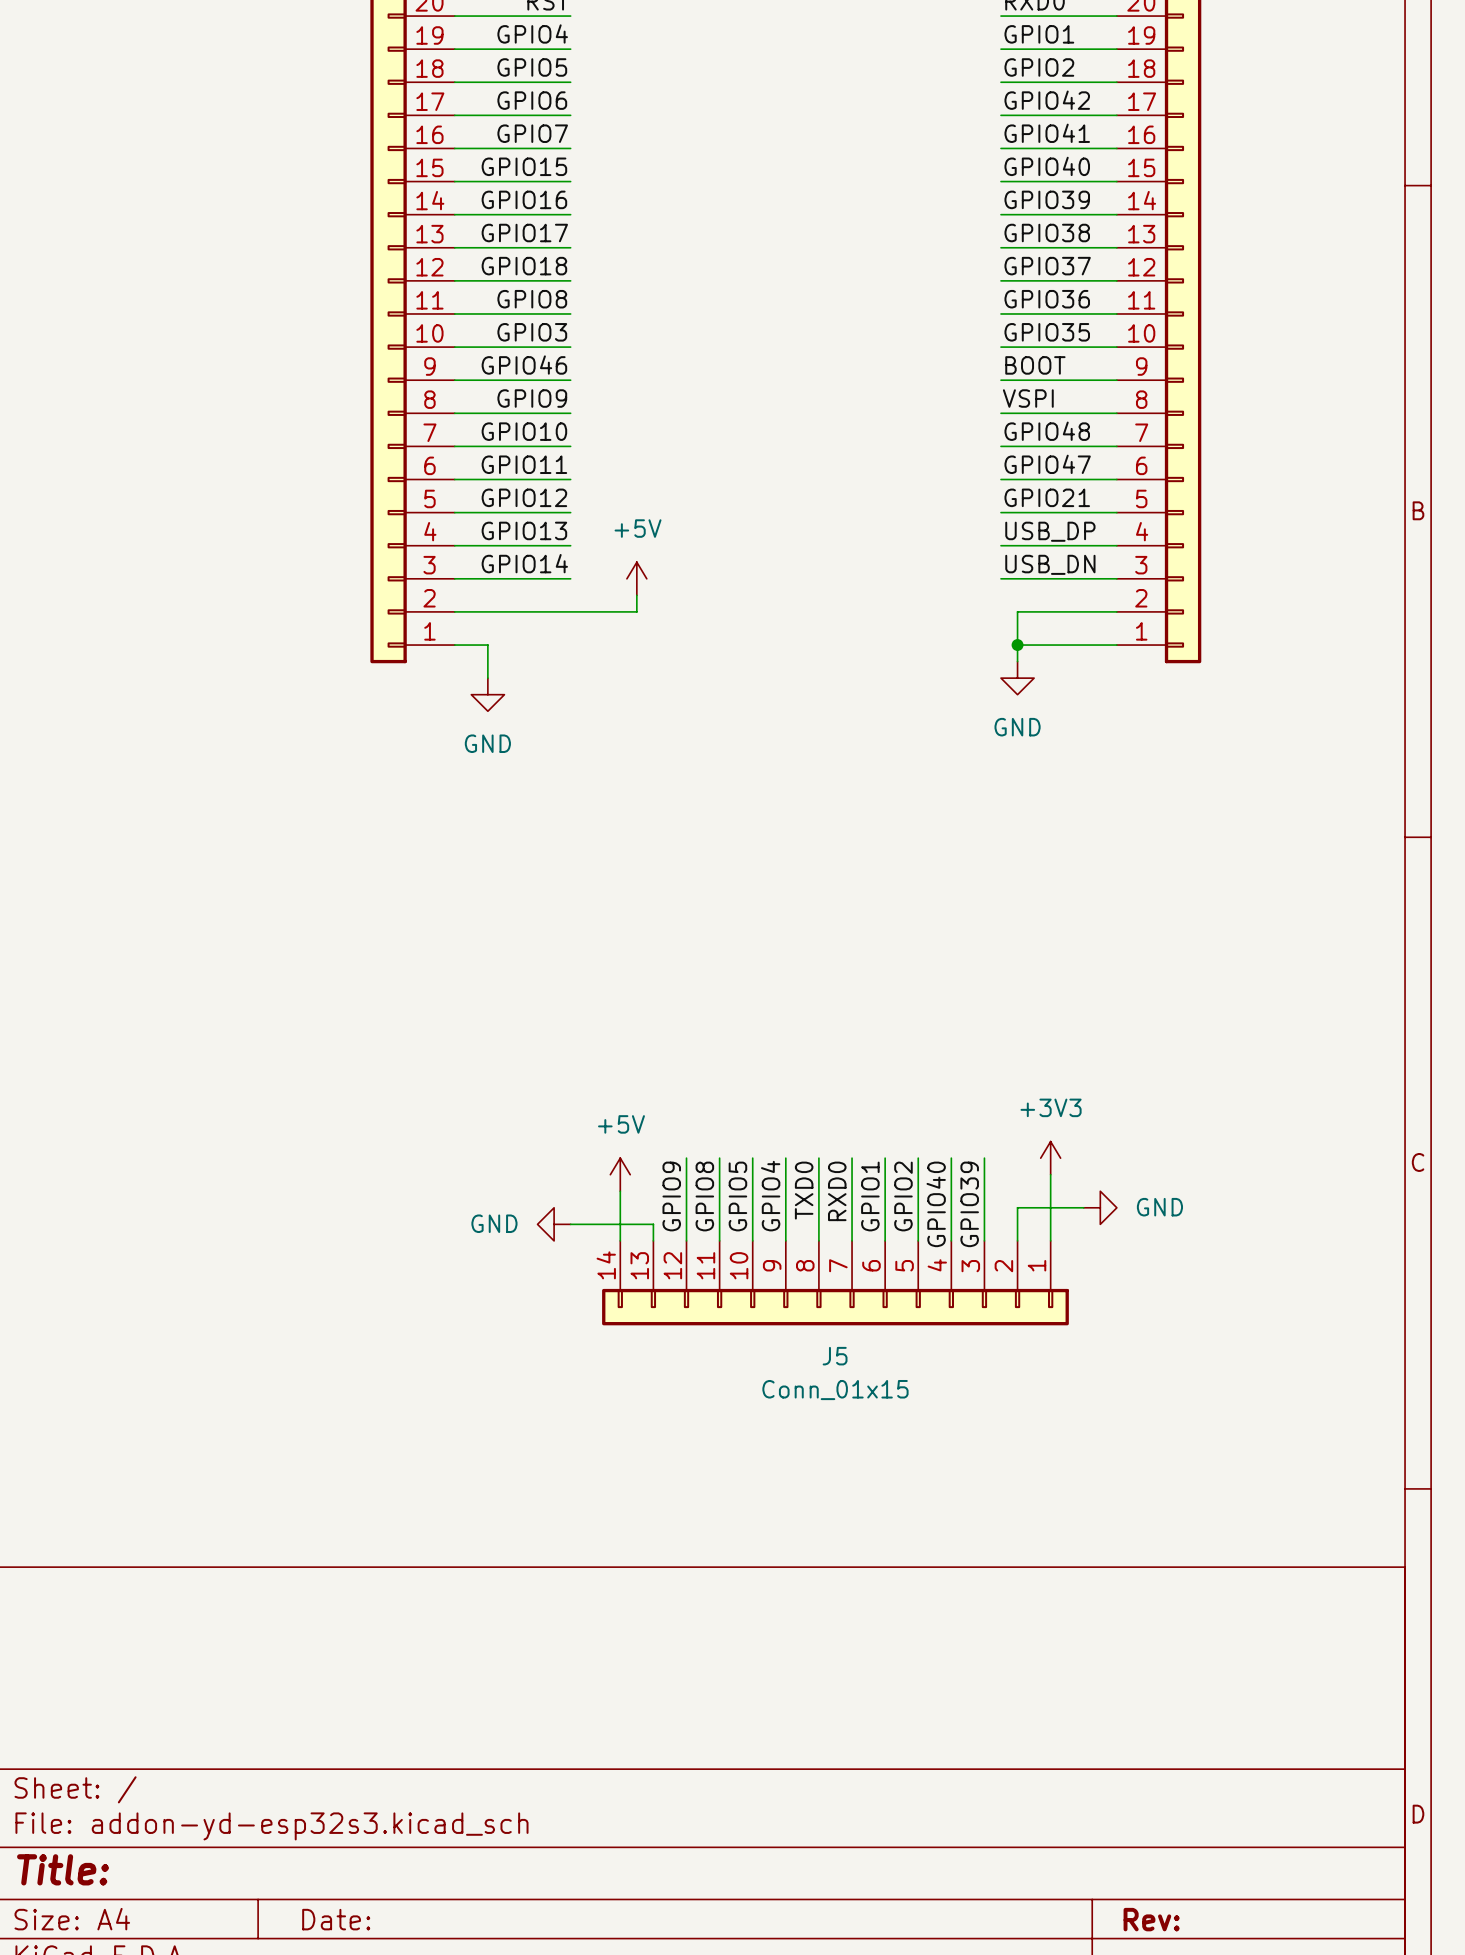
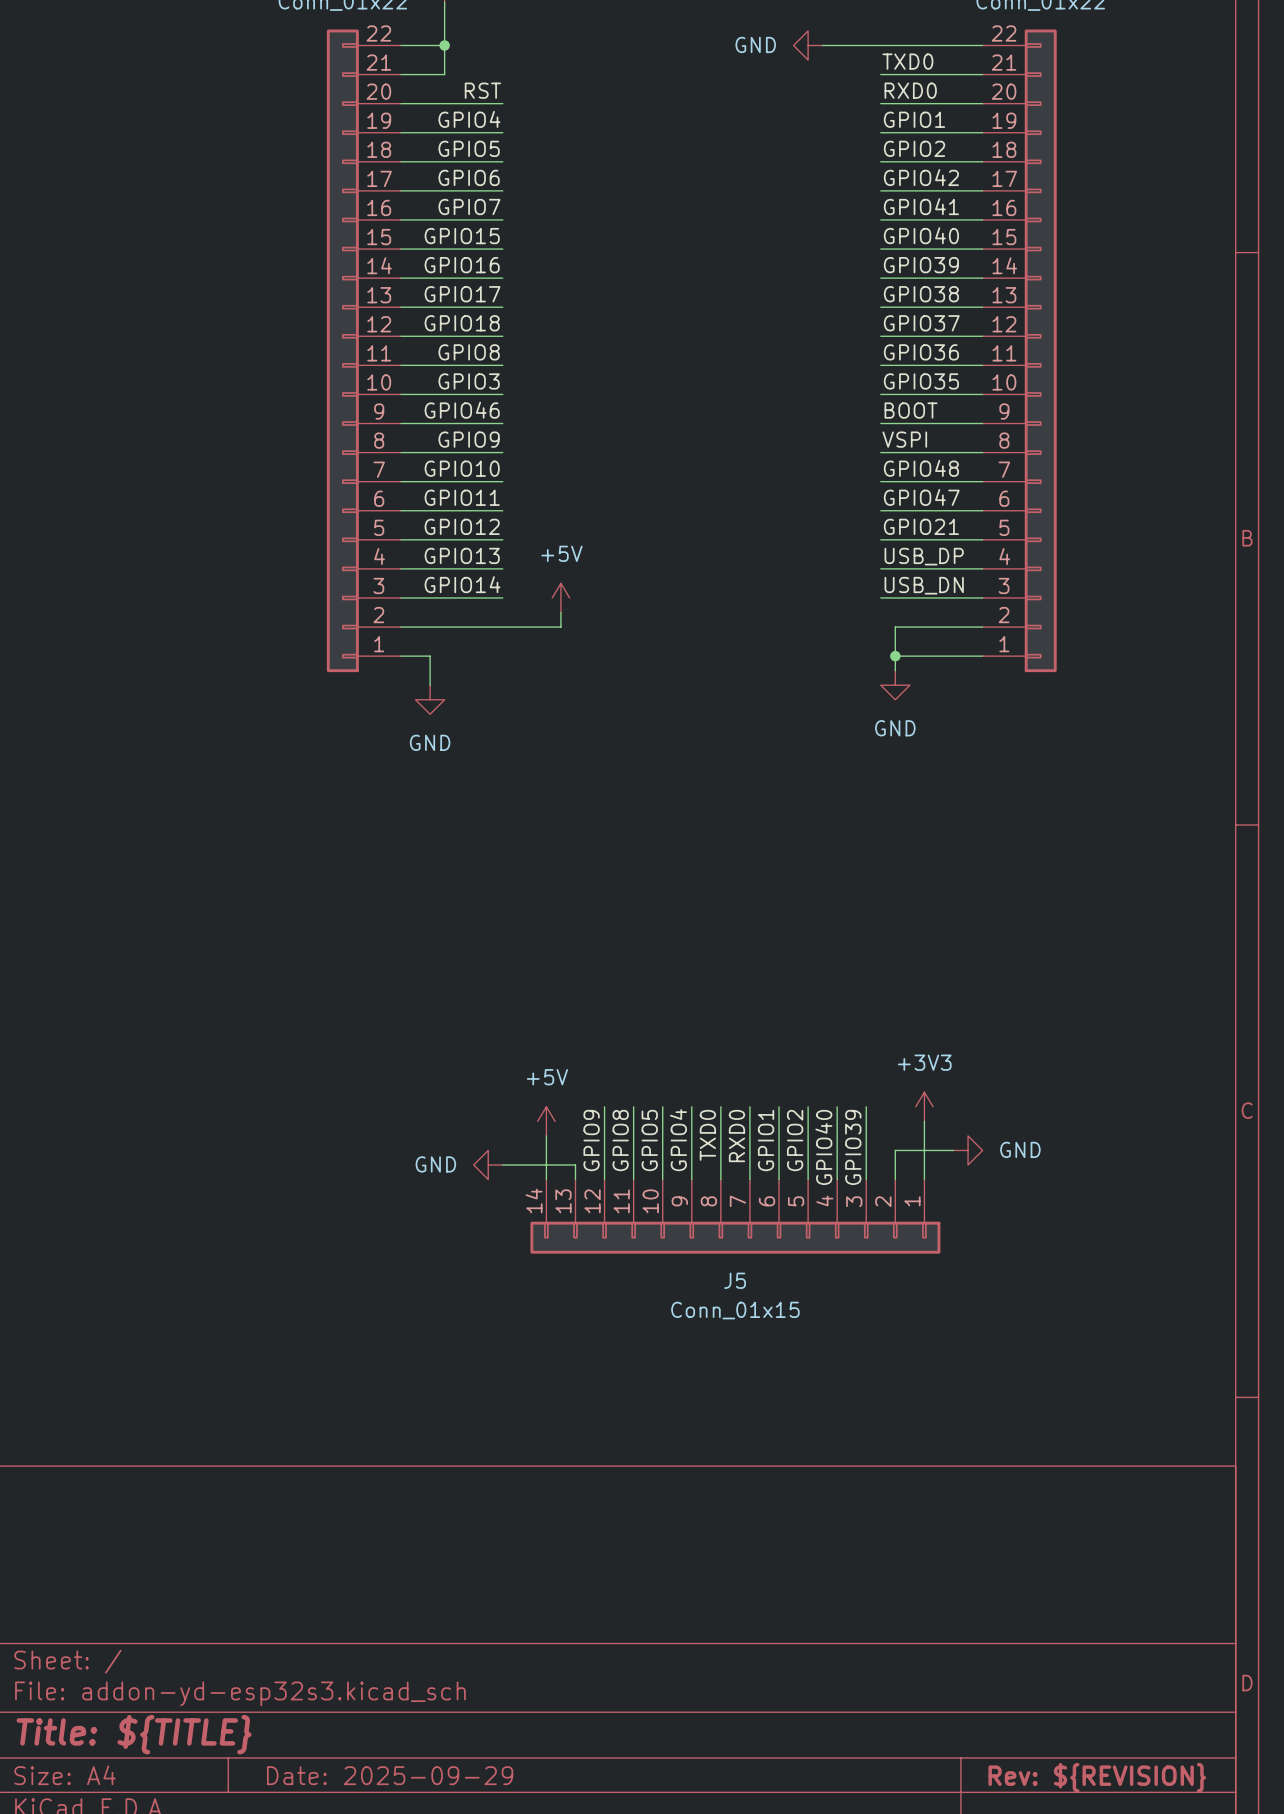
title block: Title: (63, 1869) -> Title: ${TITLE} (134, 1734)
title block: Date: (336, 1919) -> Date: 2025-09-29 (390, 1775)
title block: Rev: (1151, 1919) -> Rev: ${REVISION} (1097, 1777)

